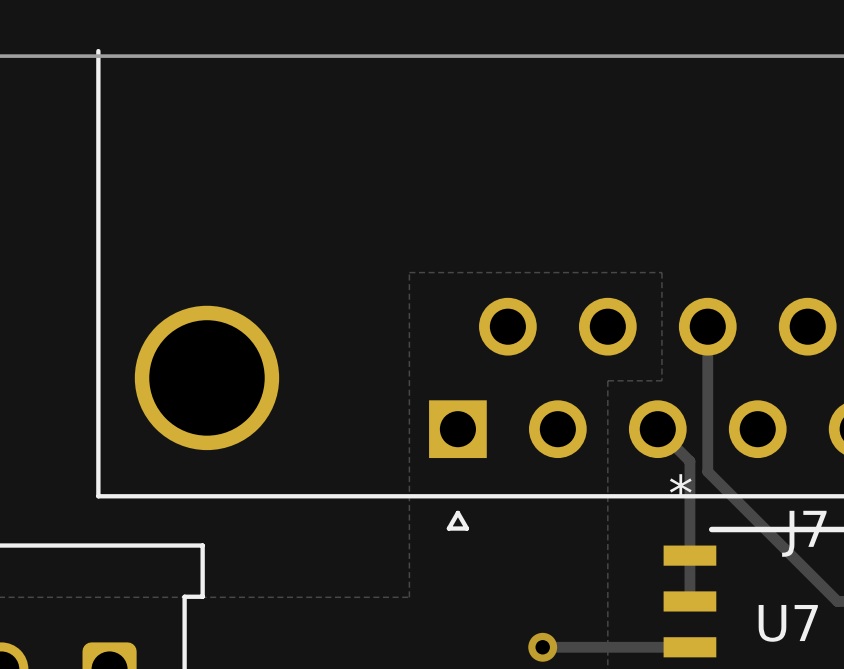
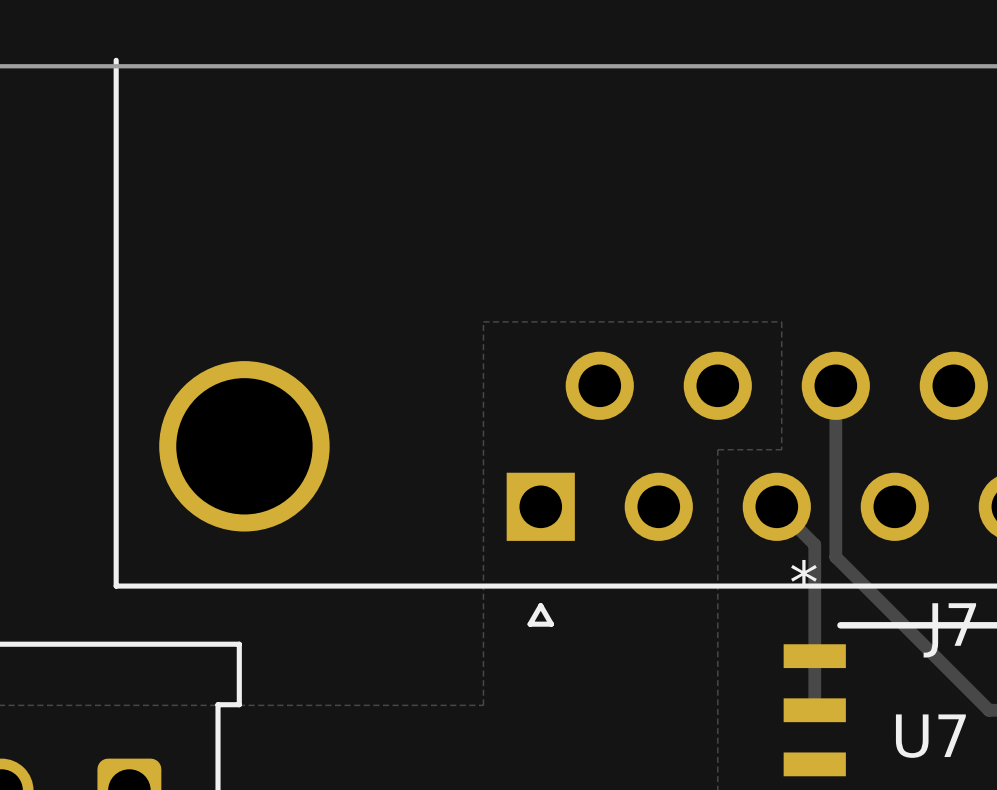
track: (542, 647) (689, 647) -> none
via: (542, 647) -> none

